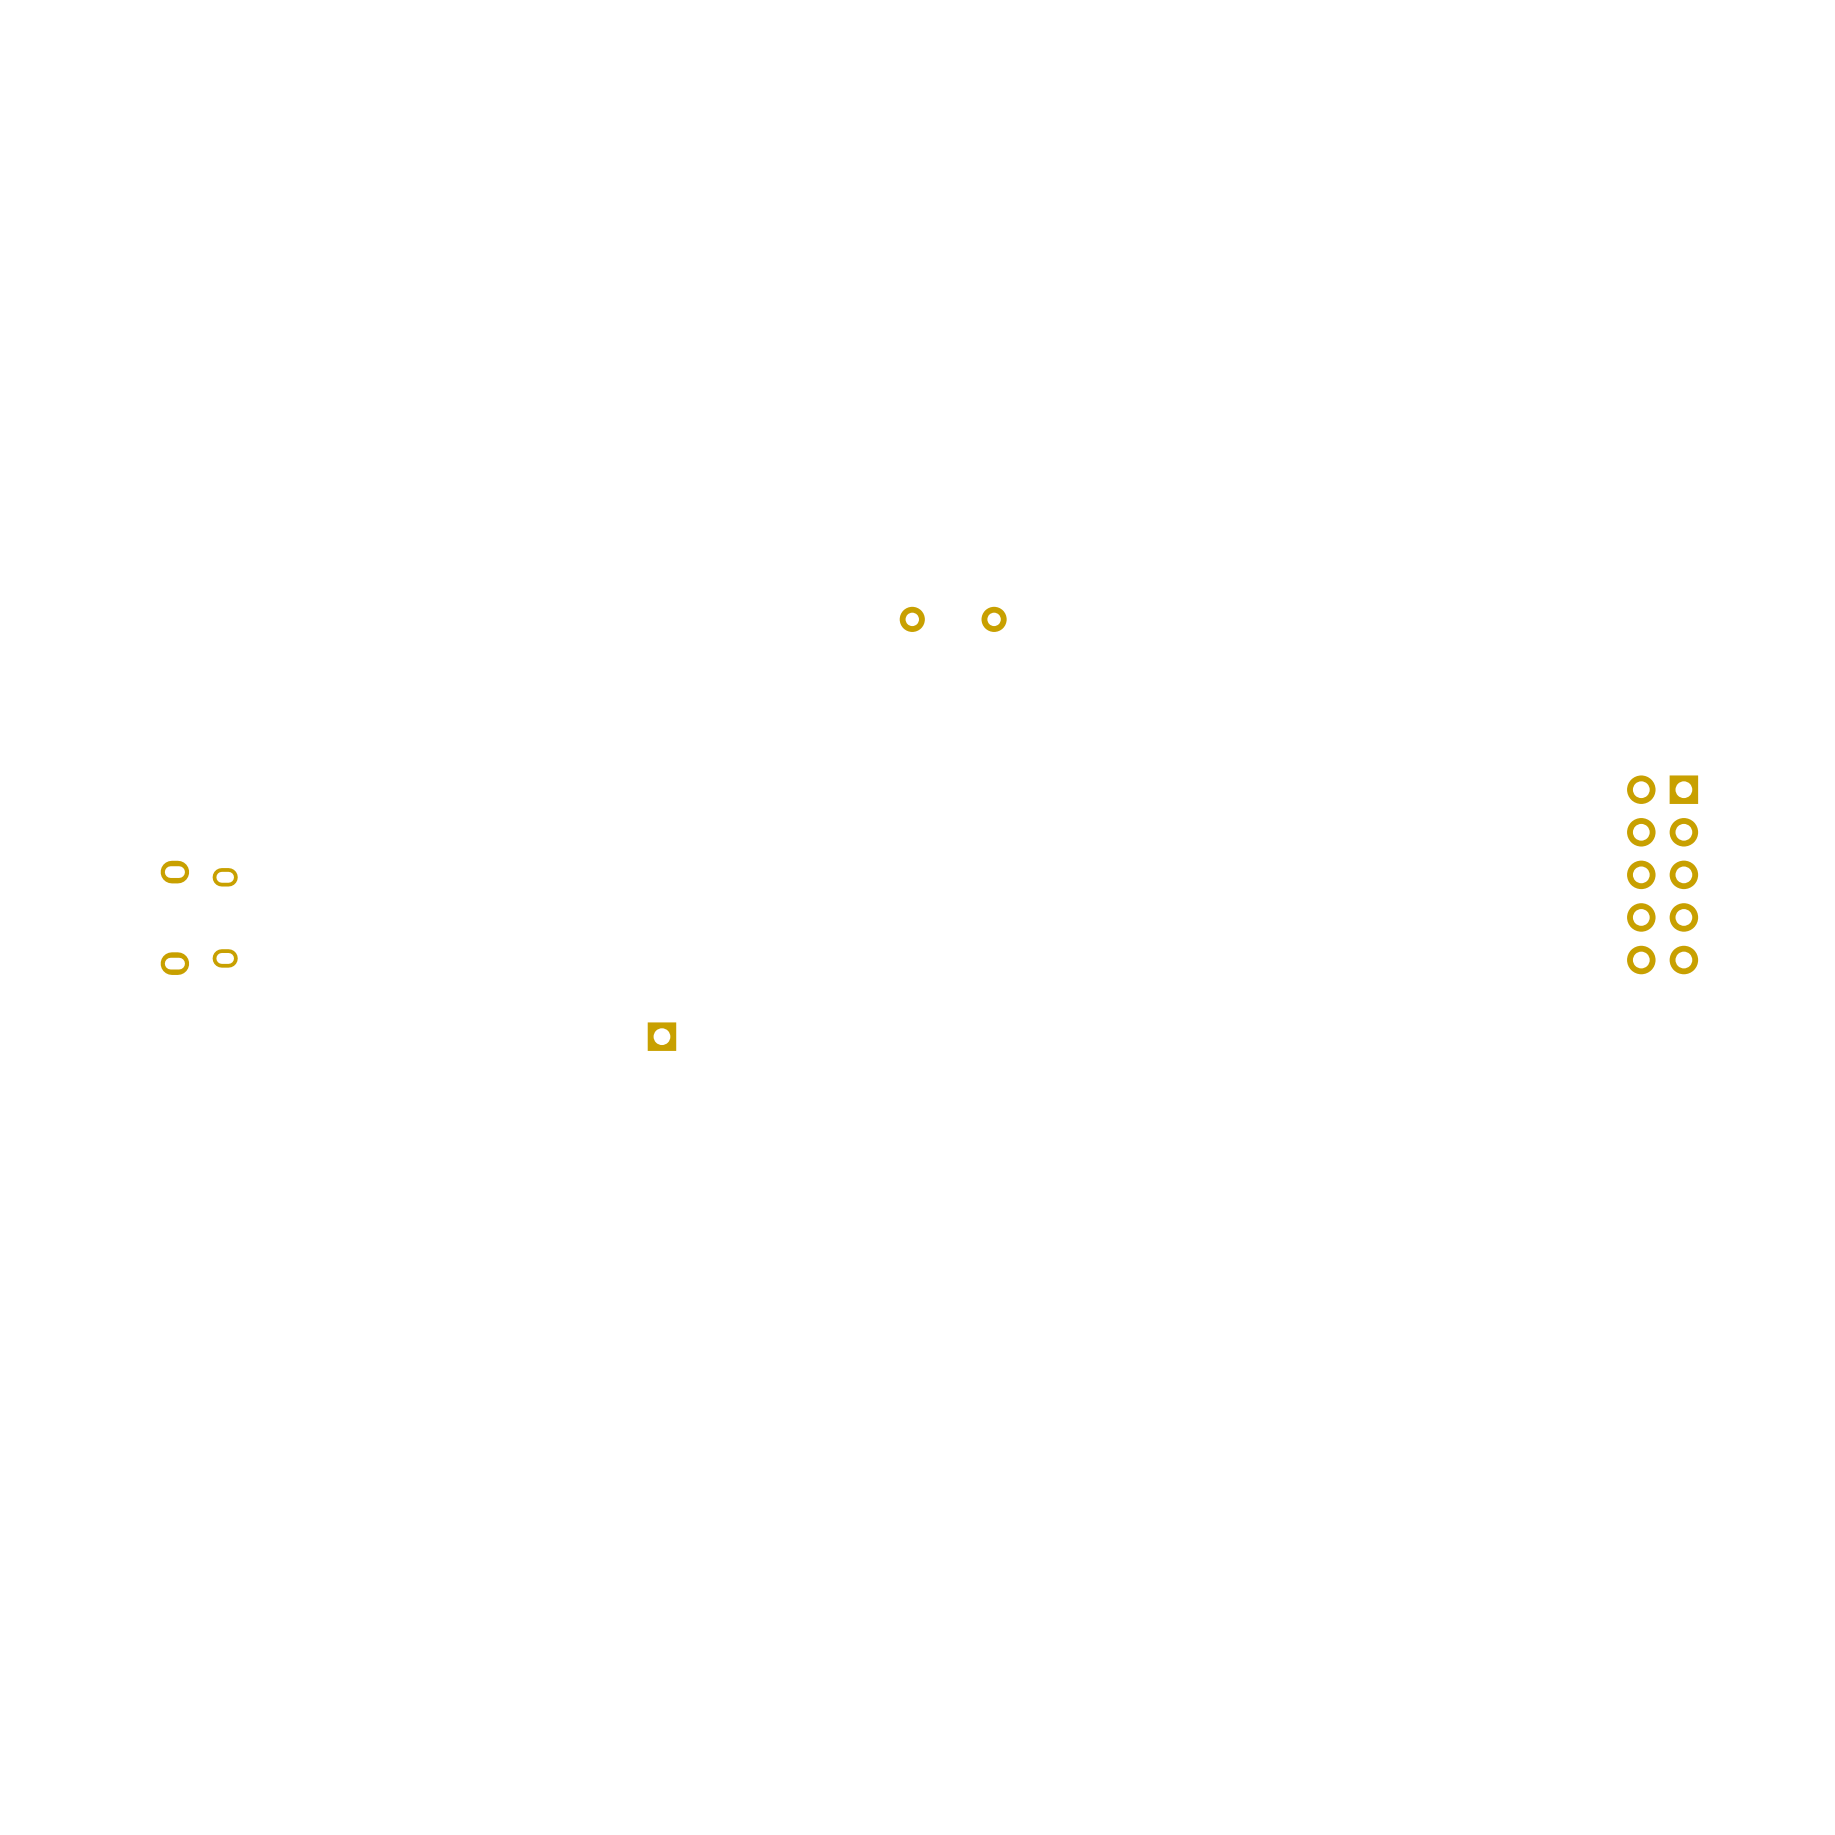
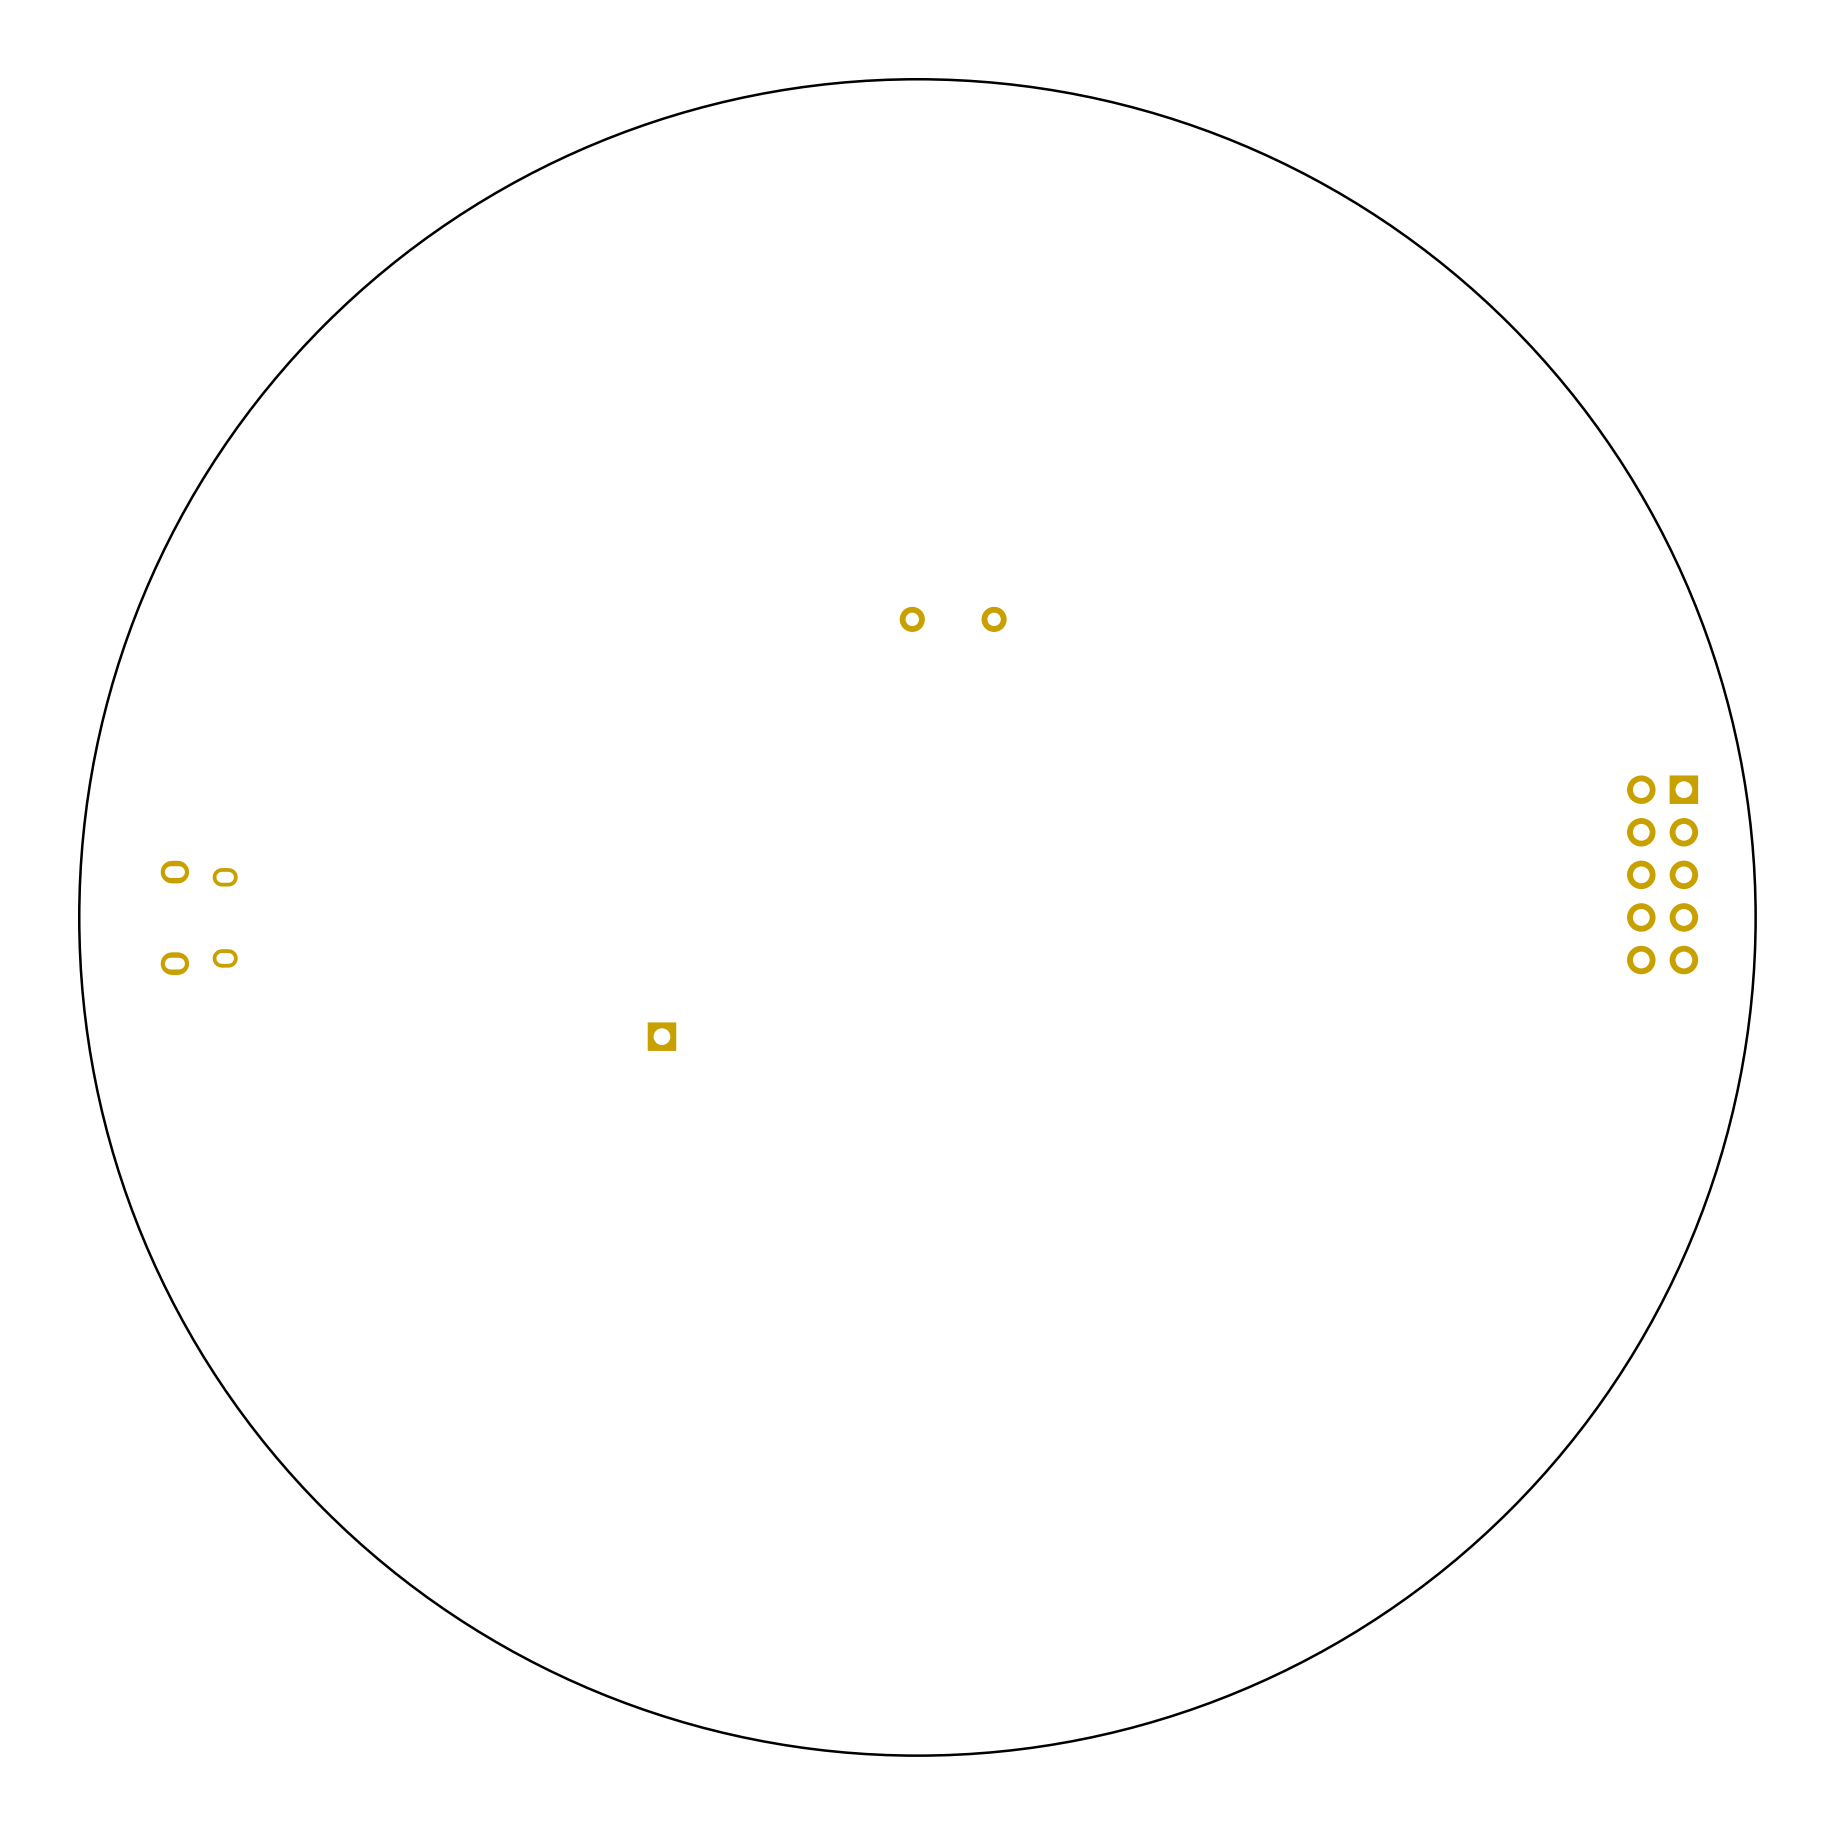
round board edge: none -> [78, 78, 1757, 1757]

